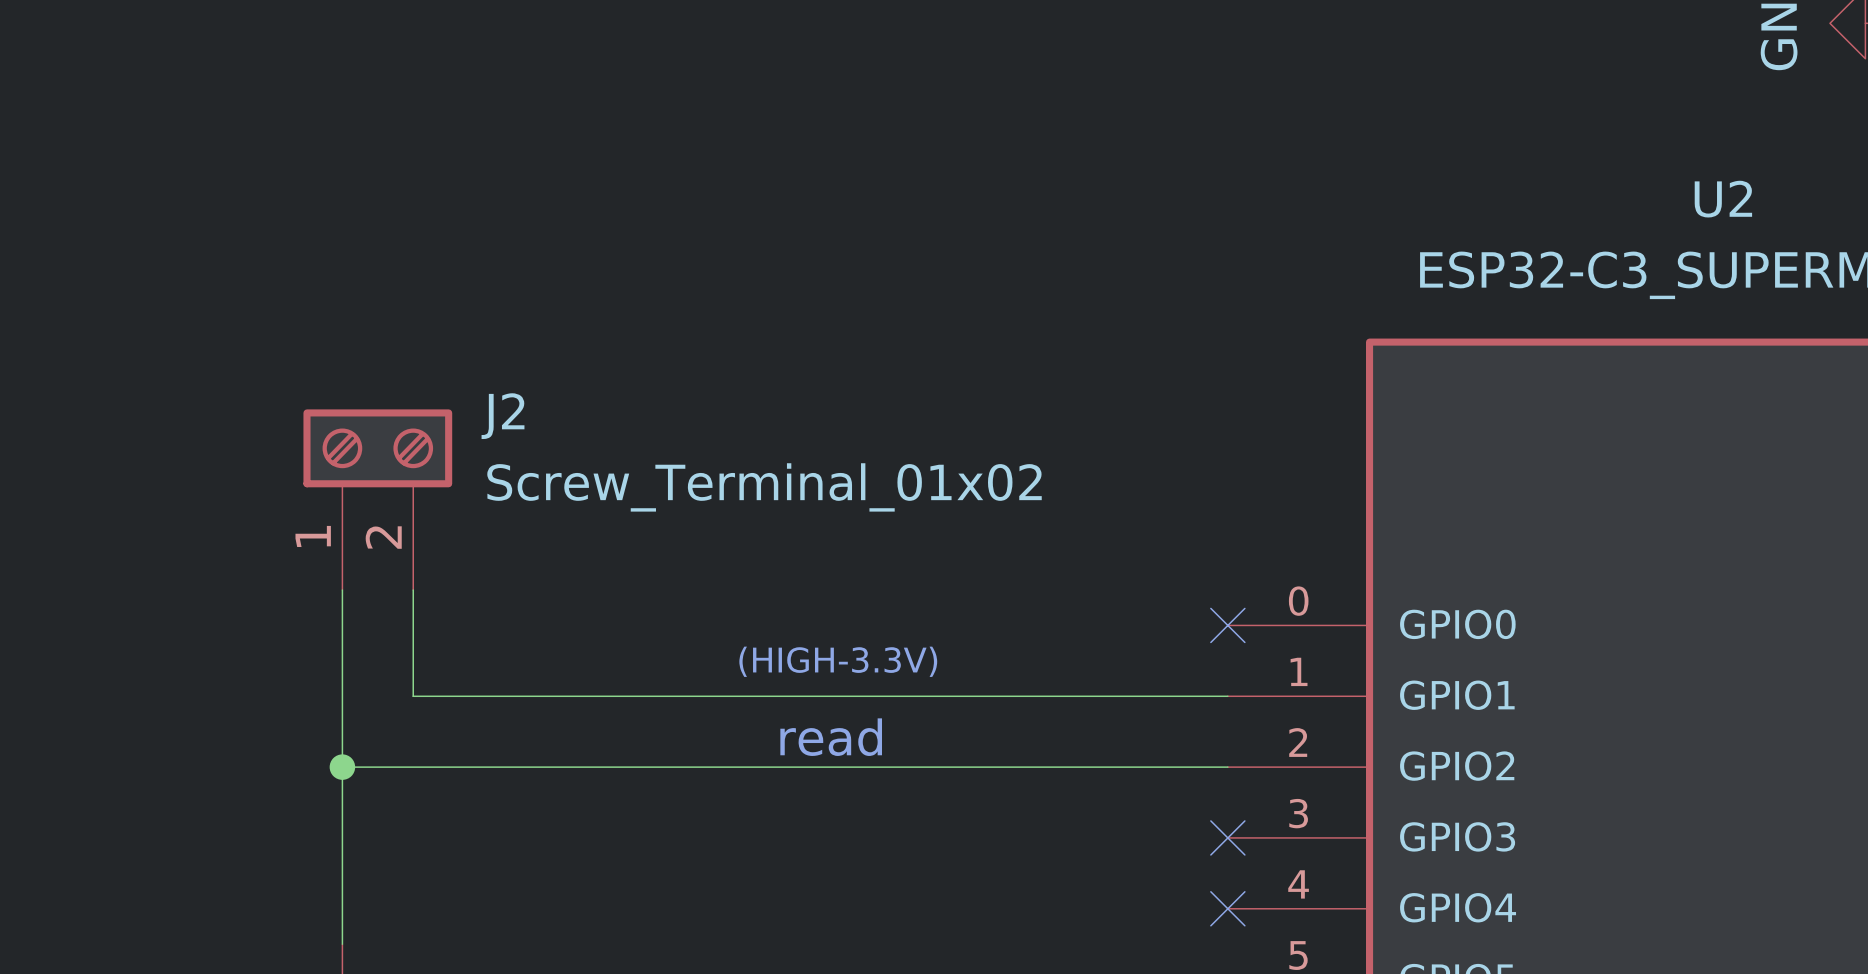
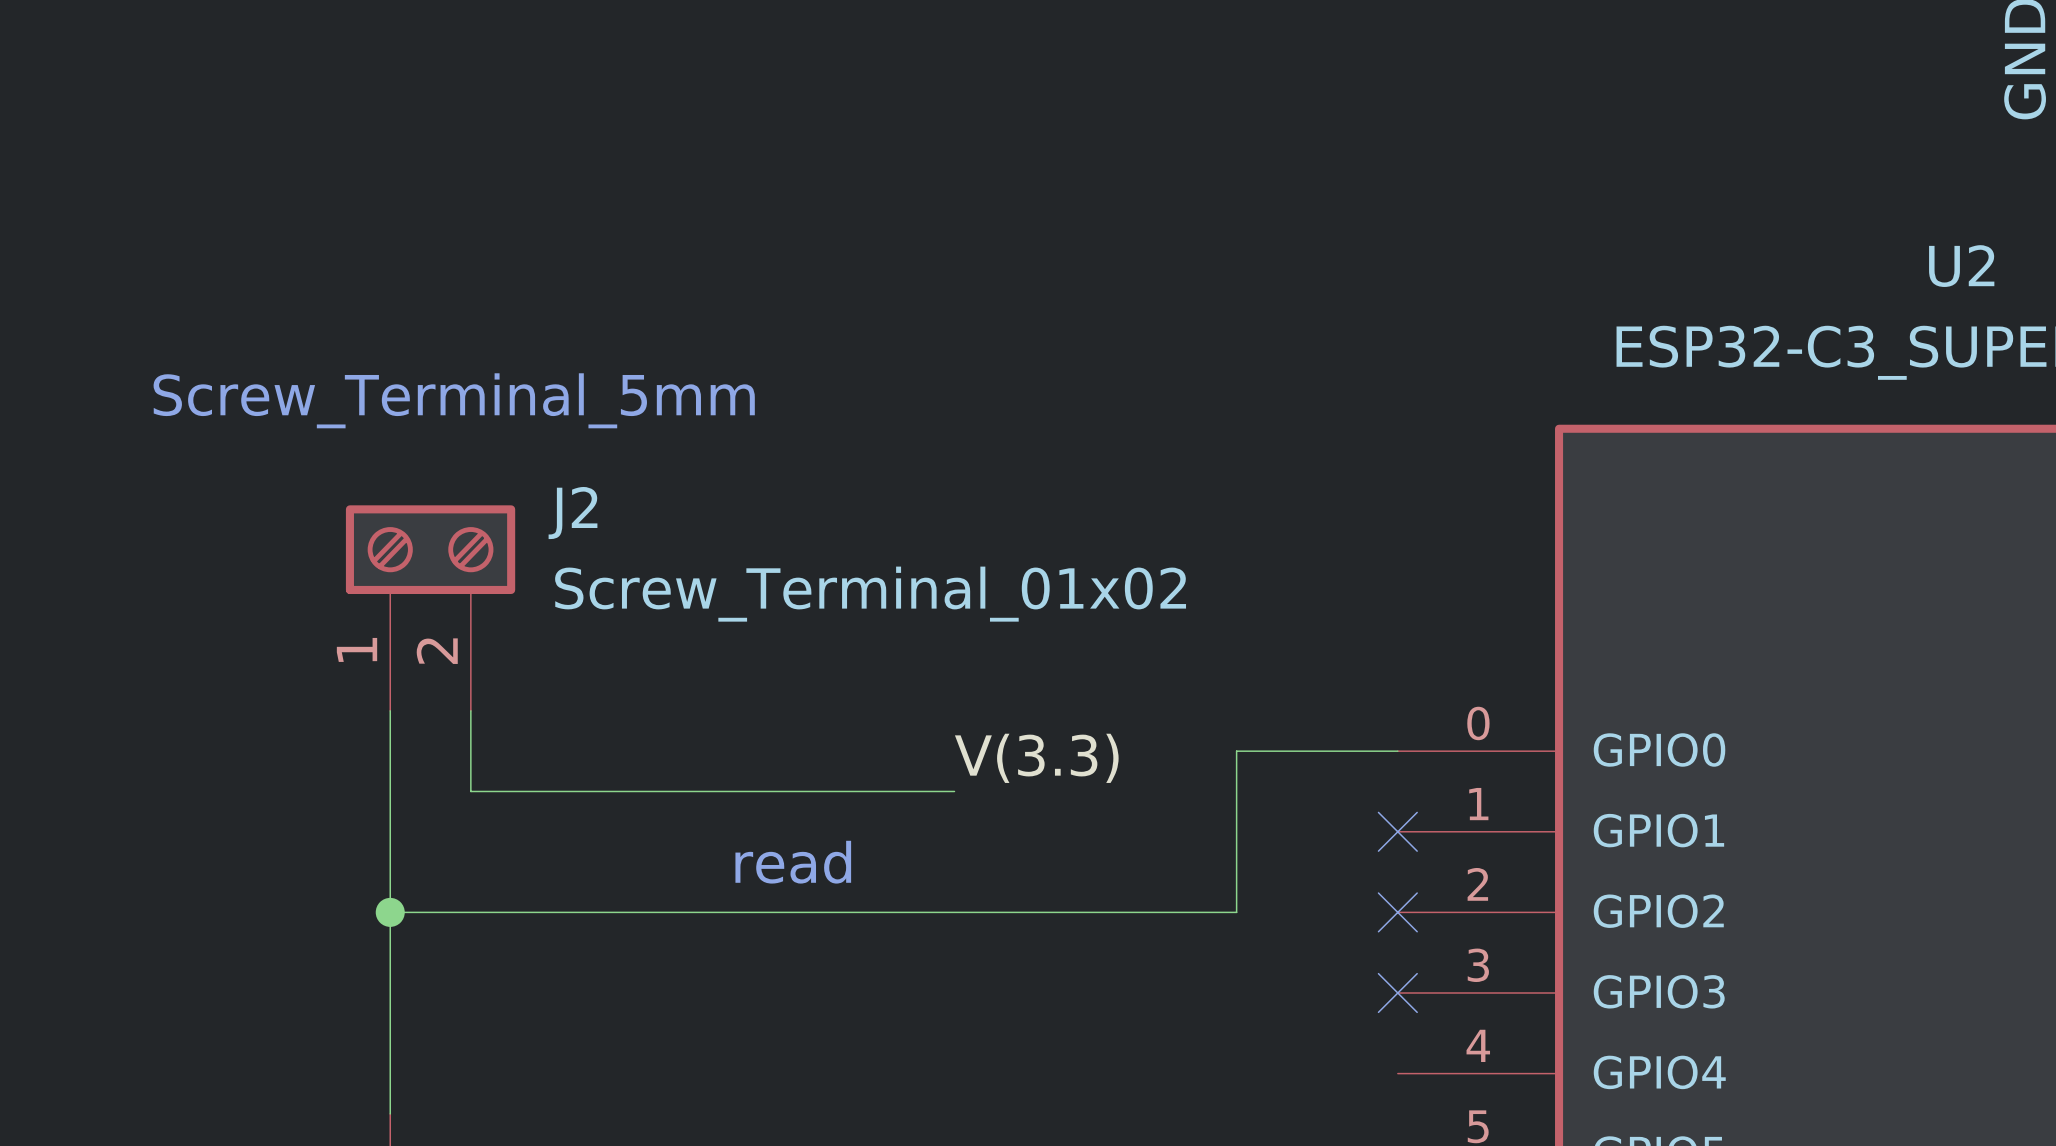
text: none -> Screw_Terminal_5mm (454, 400)
no-connect mark: (1227, 625) -> none
label: none -> V(3.3) (1036, 758)
wire: (413, 660) (413, 696) (1227, 696) -> (470, 791) (954, 791)
text: (HIGH-3.3V) (838, 661) -> none
no-connect mark: none -> (1397, 831)
text position: read (831, 737) -> read (793, 862)
wire: (1086, 767) (1227, 767) -> (1236, 912) (1236, 751) (1397, 751)
no-connect mark: none -> (1397, 912)
no-connect mark: (1227, 908) -> none

